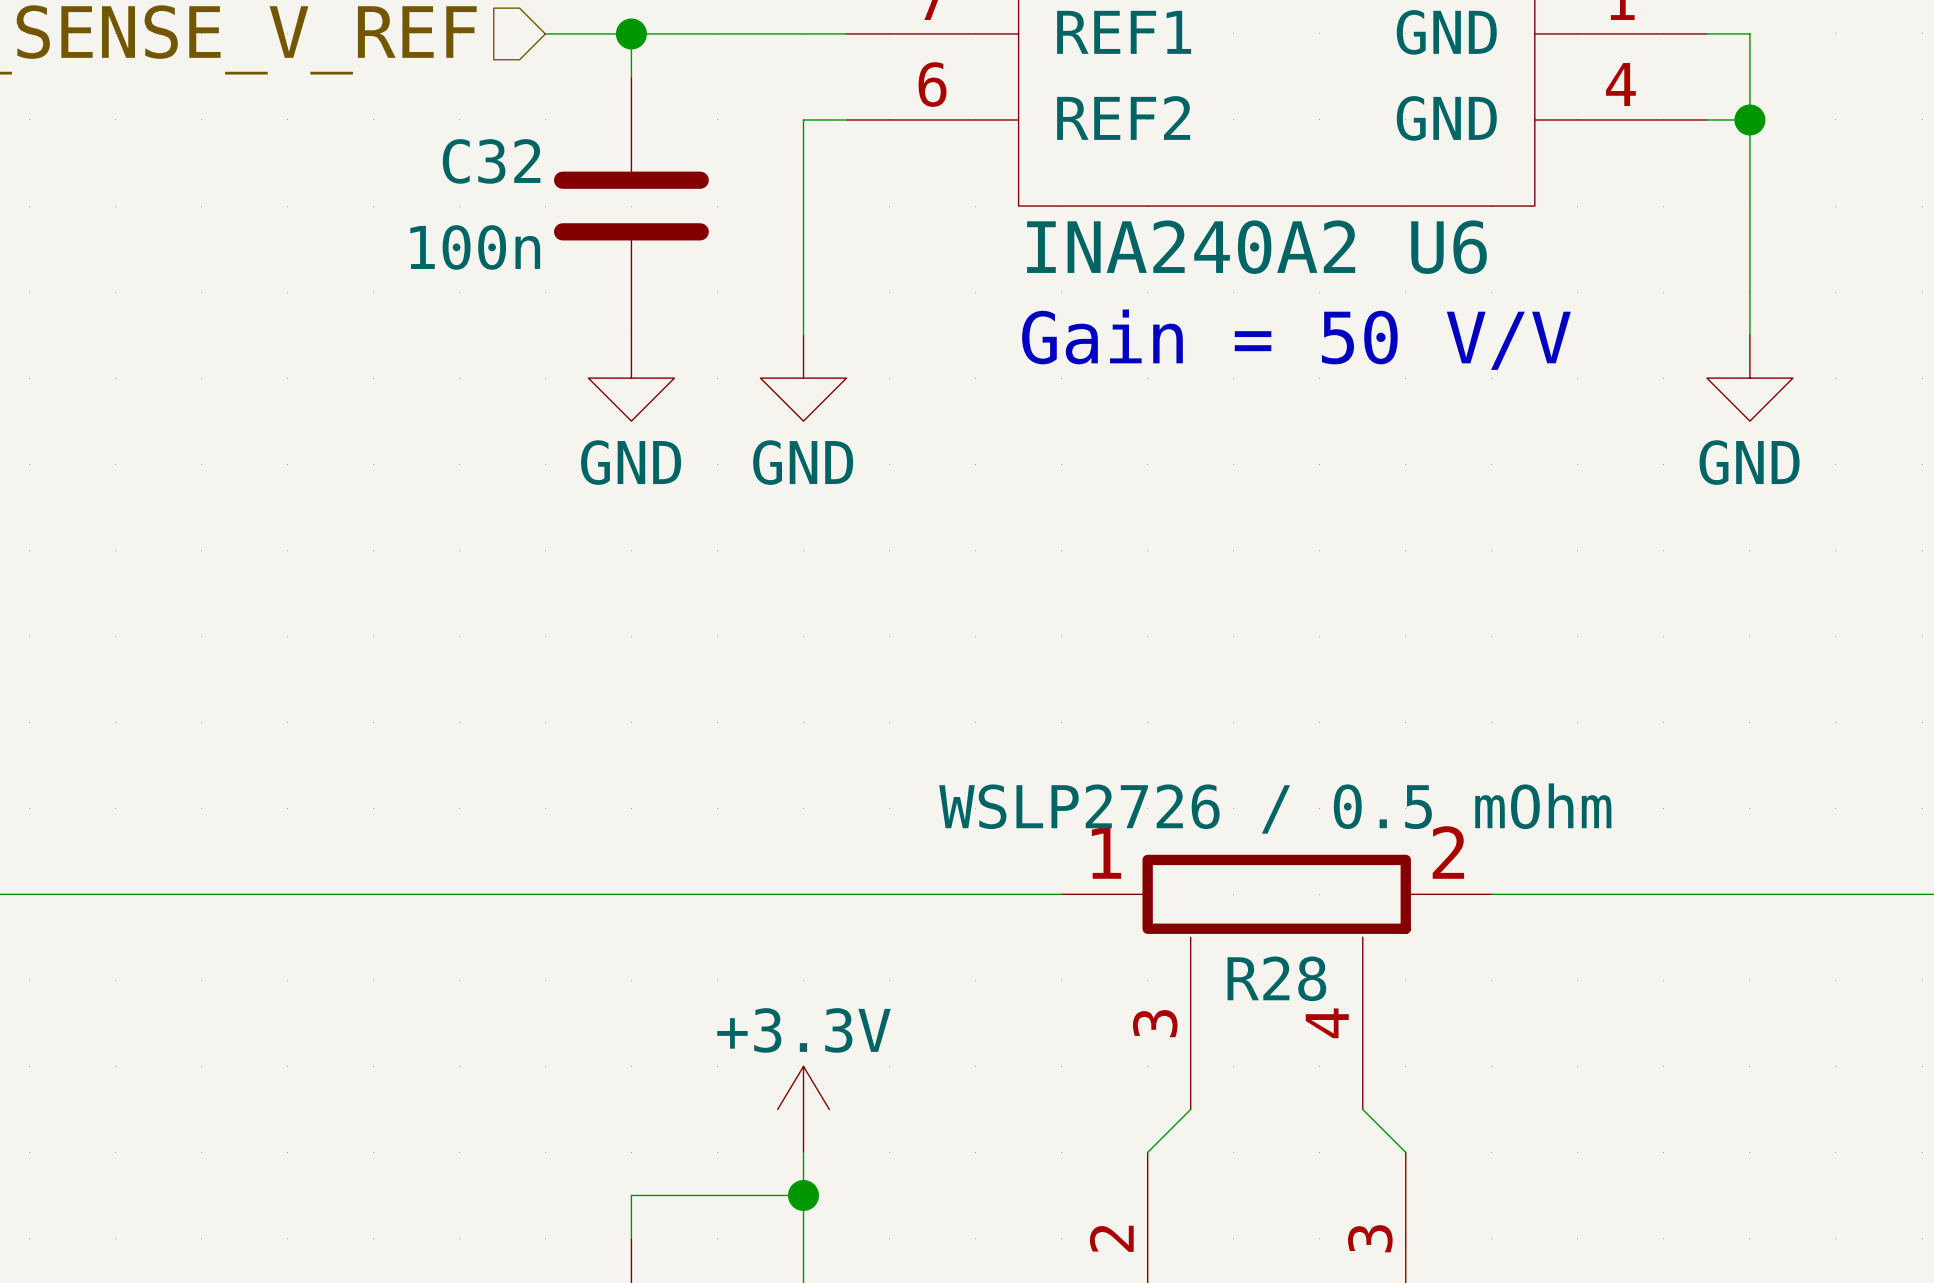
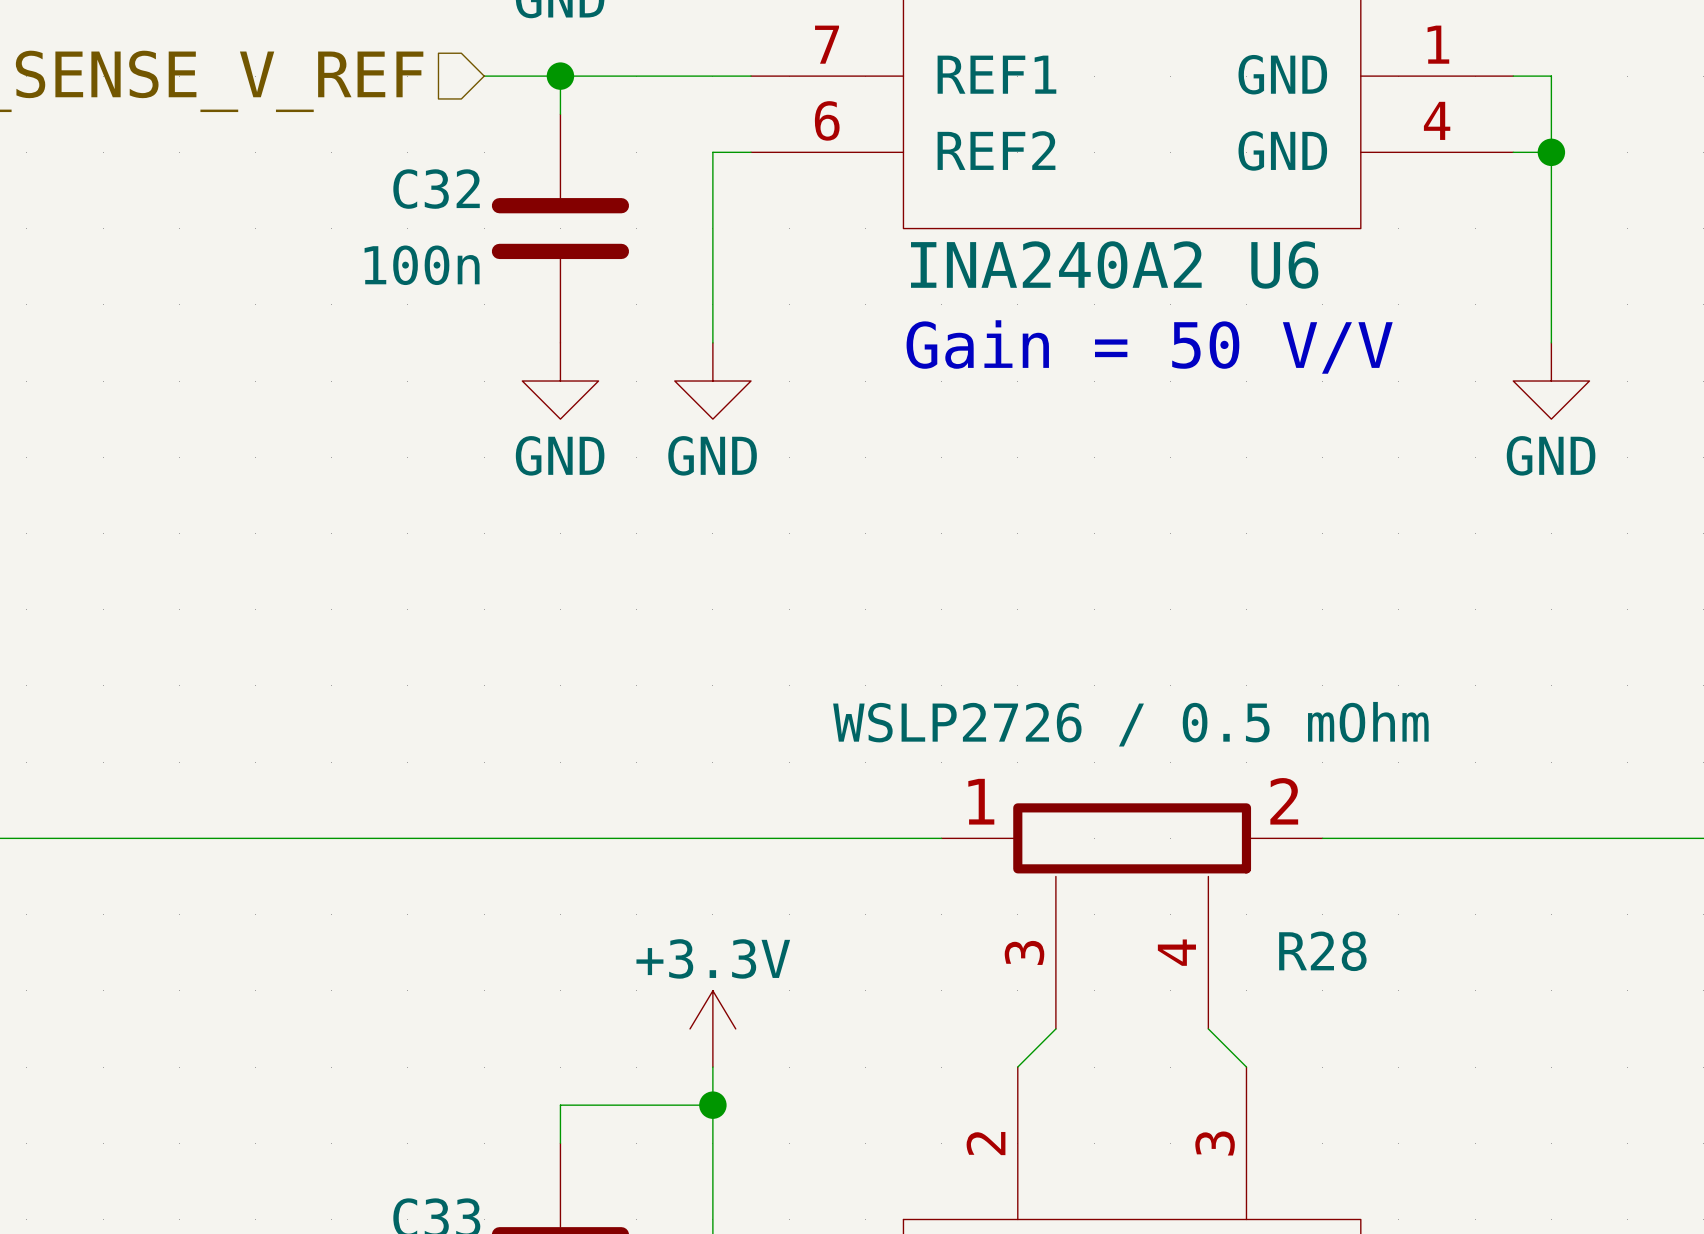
R28 value position: WSLP2726 / 0.5 mOhm (1275, 808) -> WSLP2726 / 0.5 mOhm (1130, 724)
R28 name position: R28 (1276, 978) -> R28 (1322, 951)

